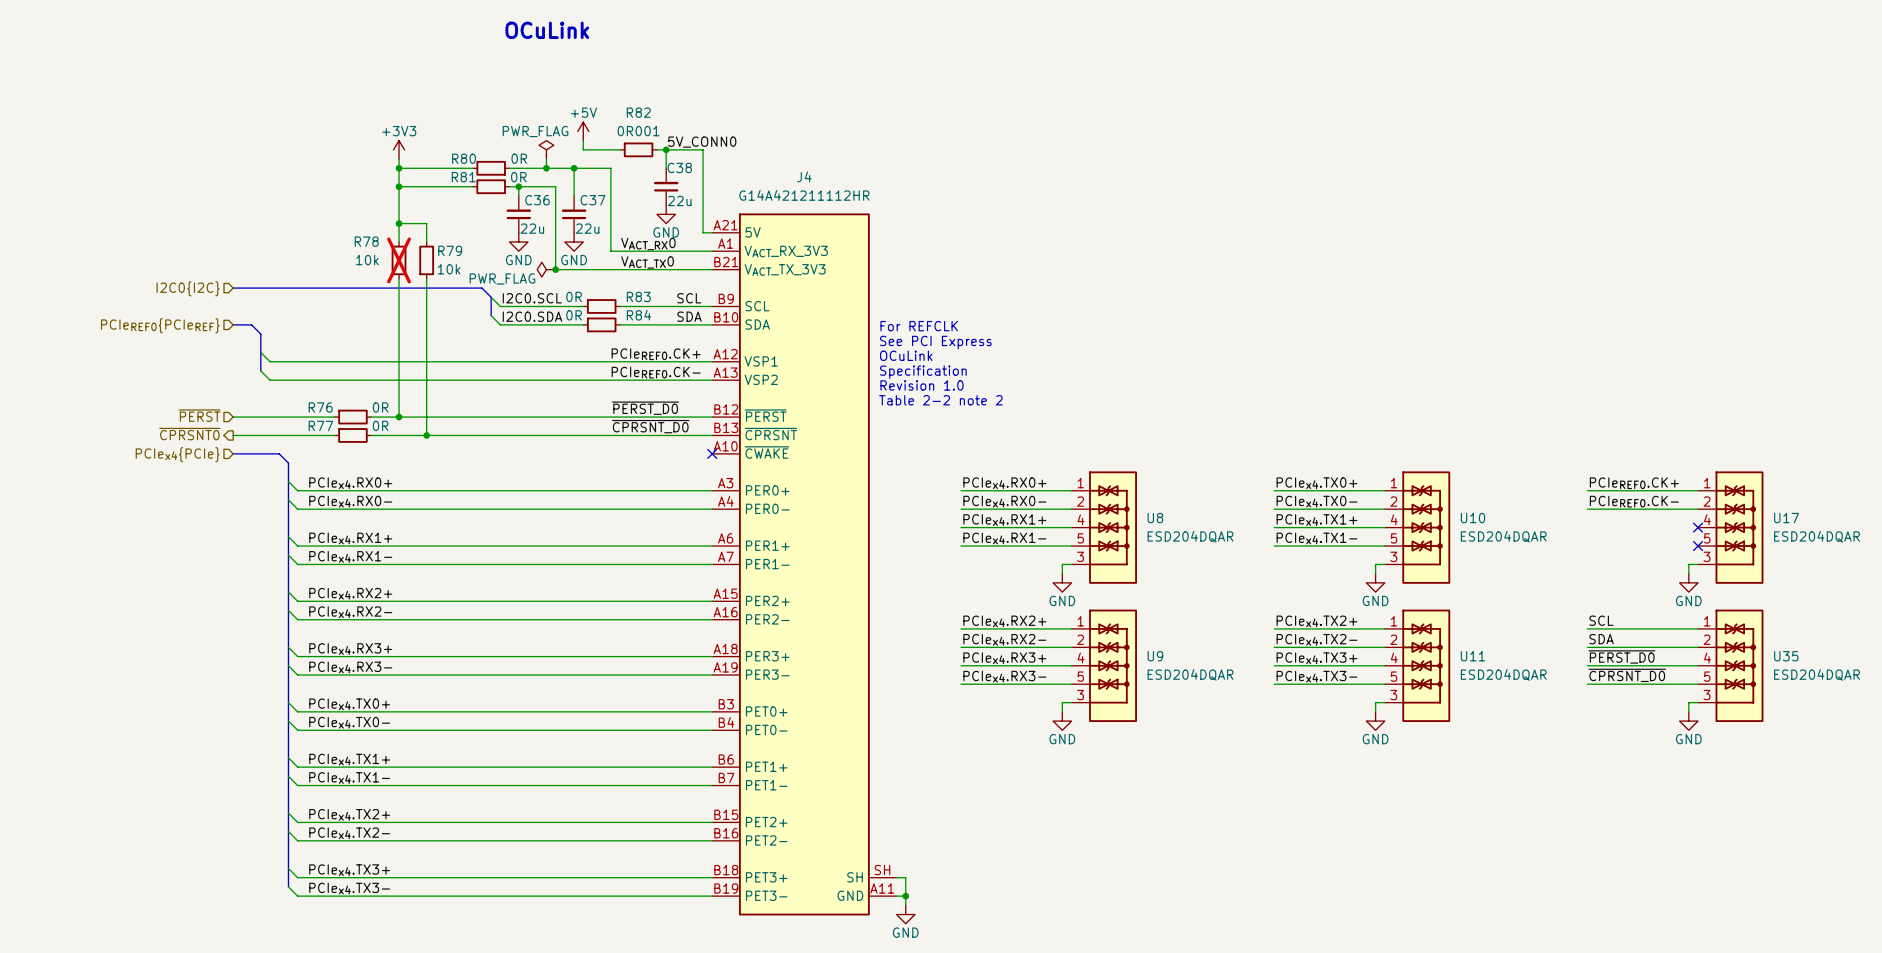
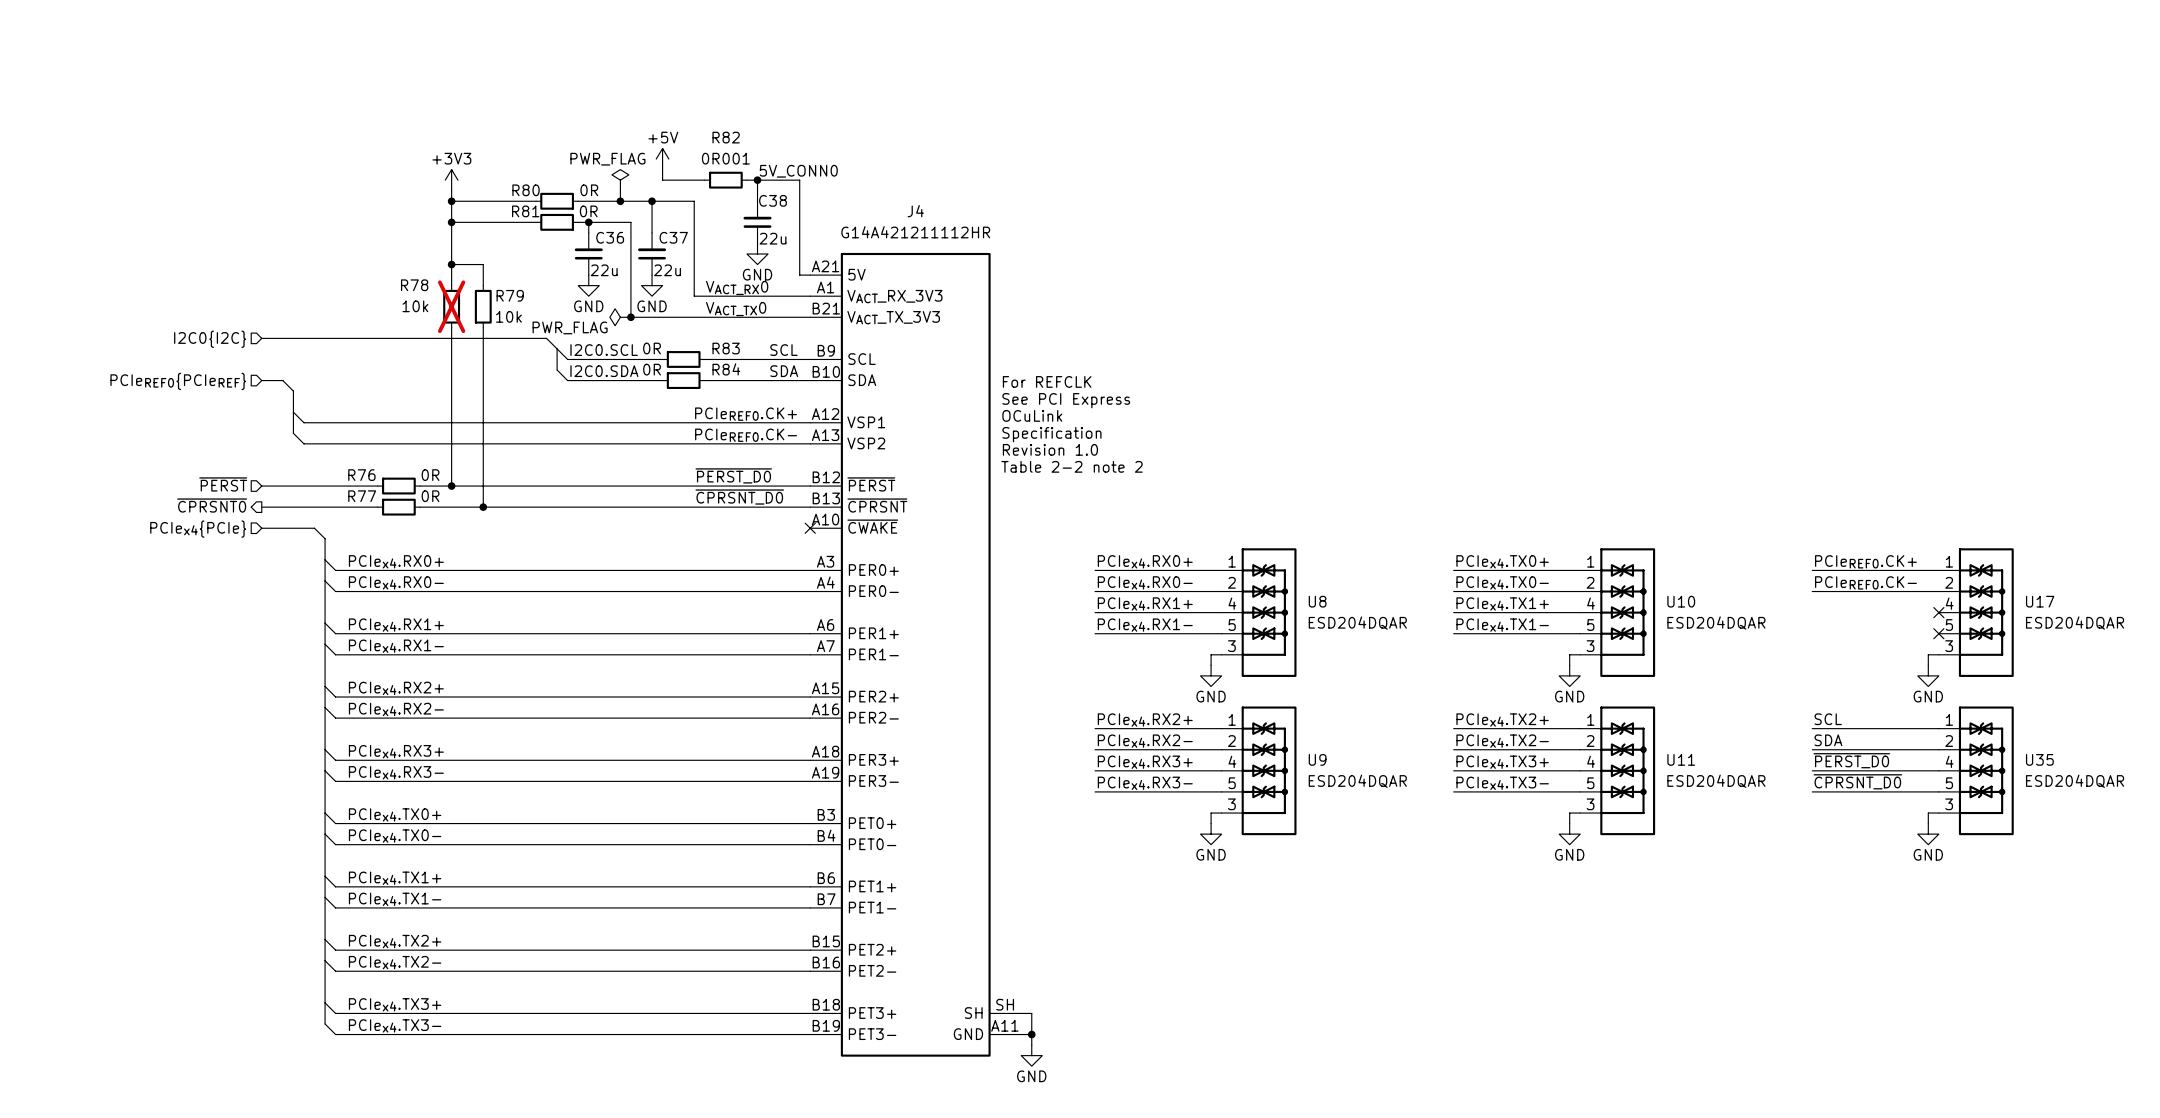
text: OCuLink (547, 30) -> none

